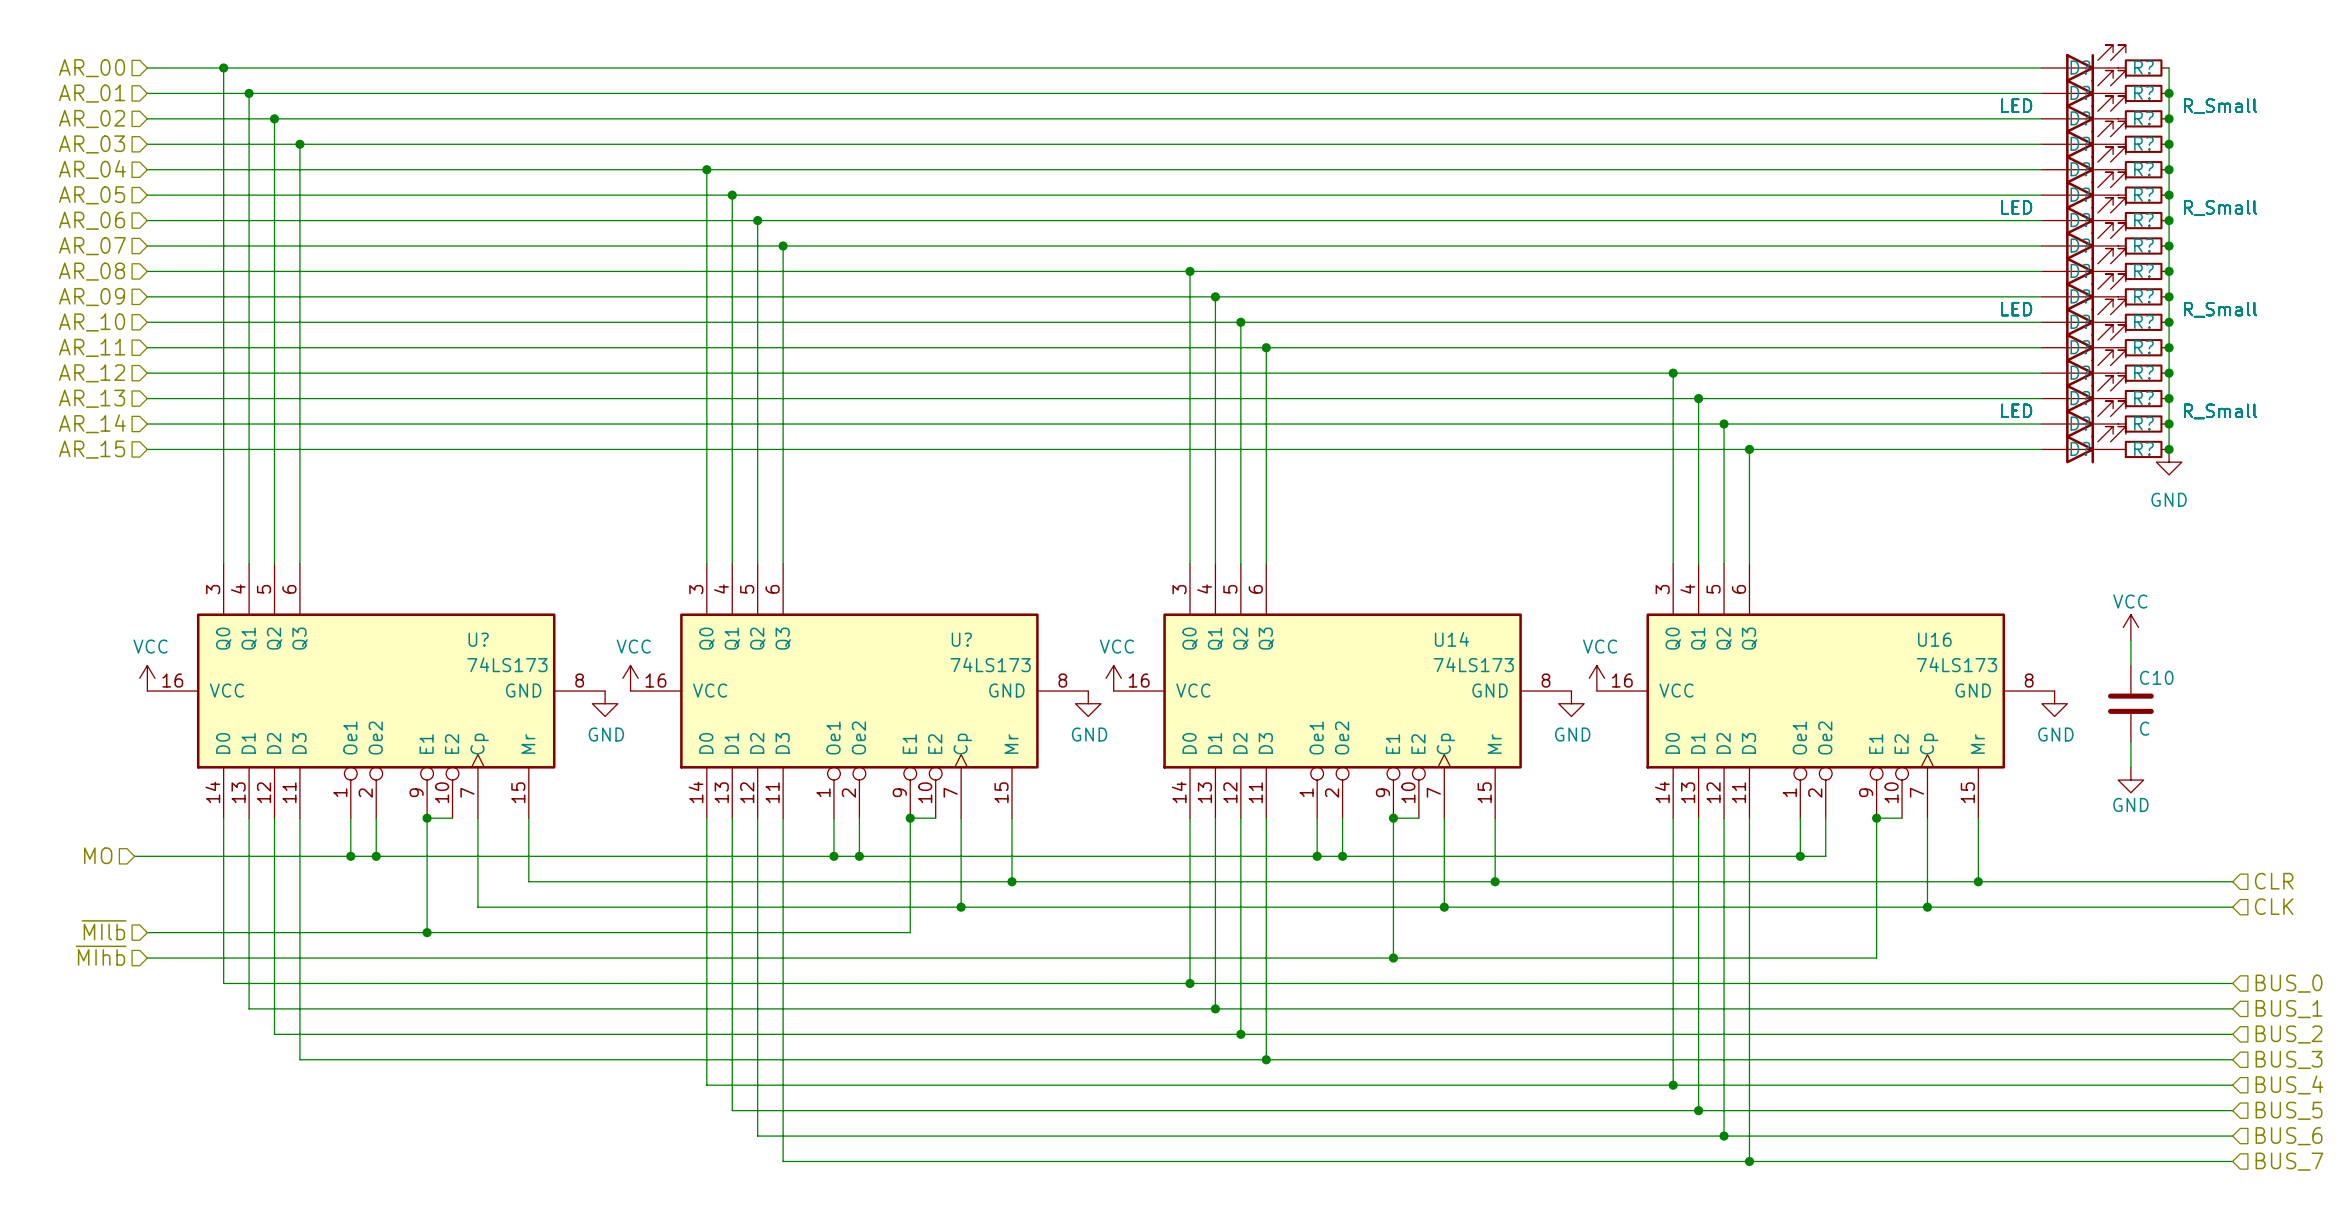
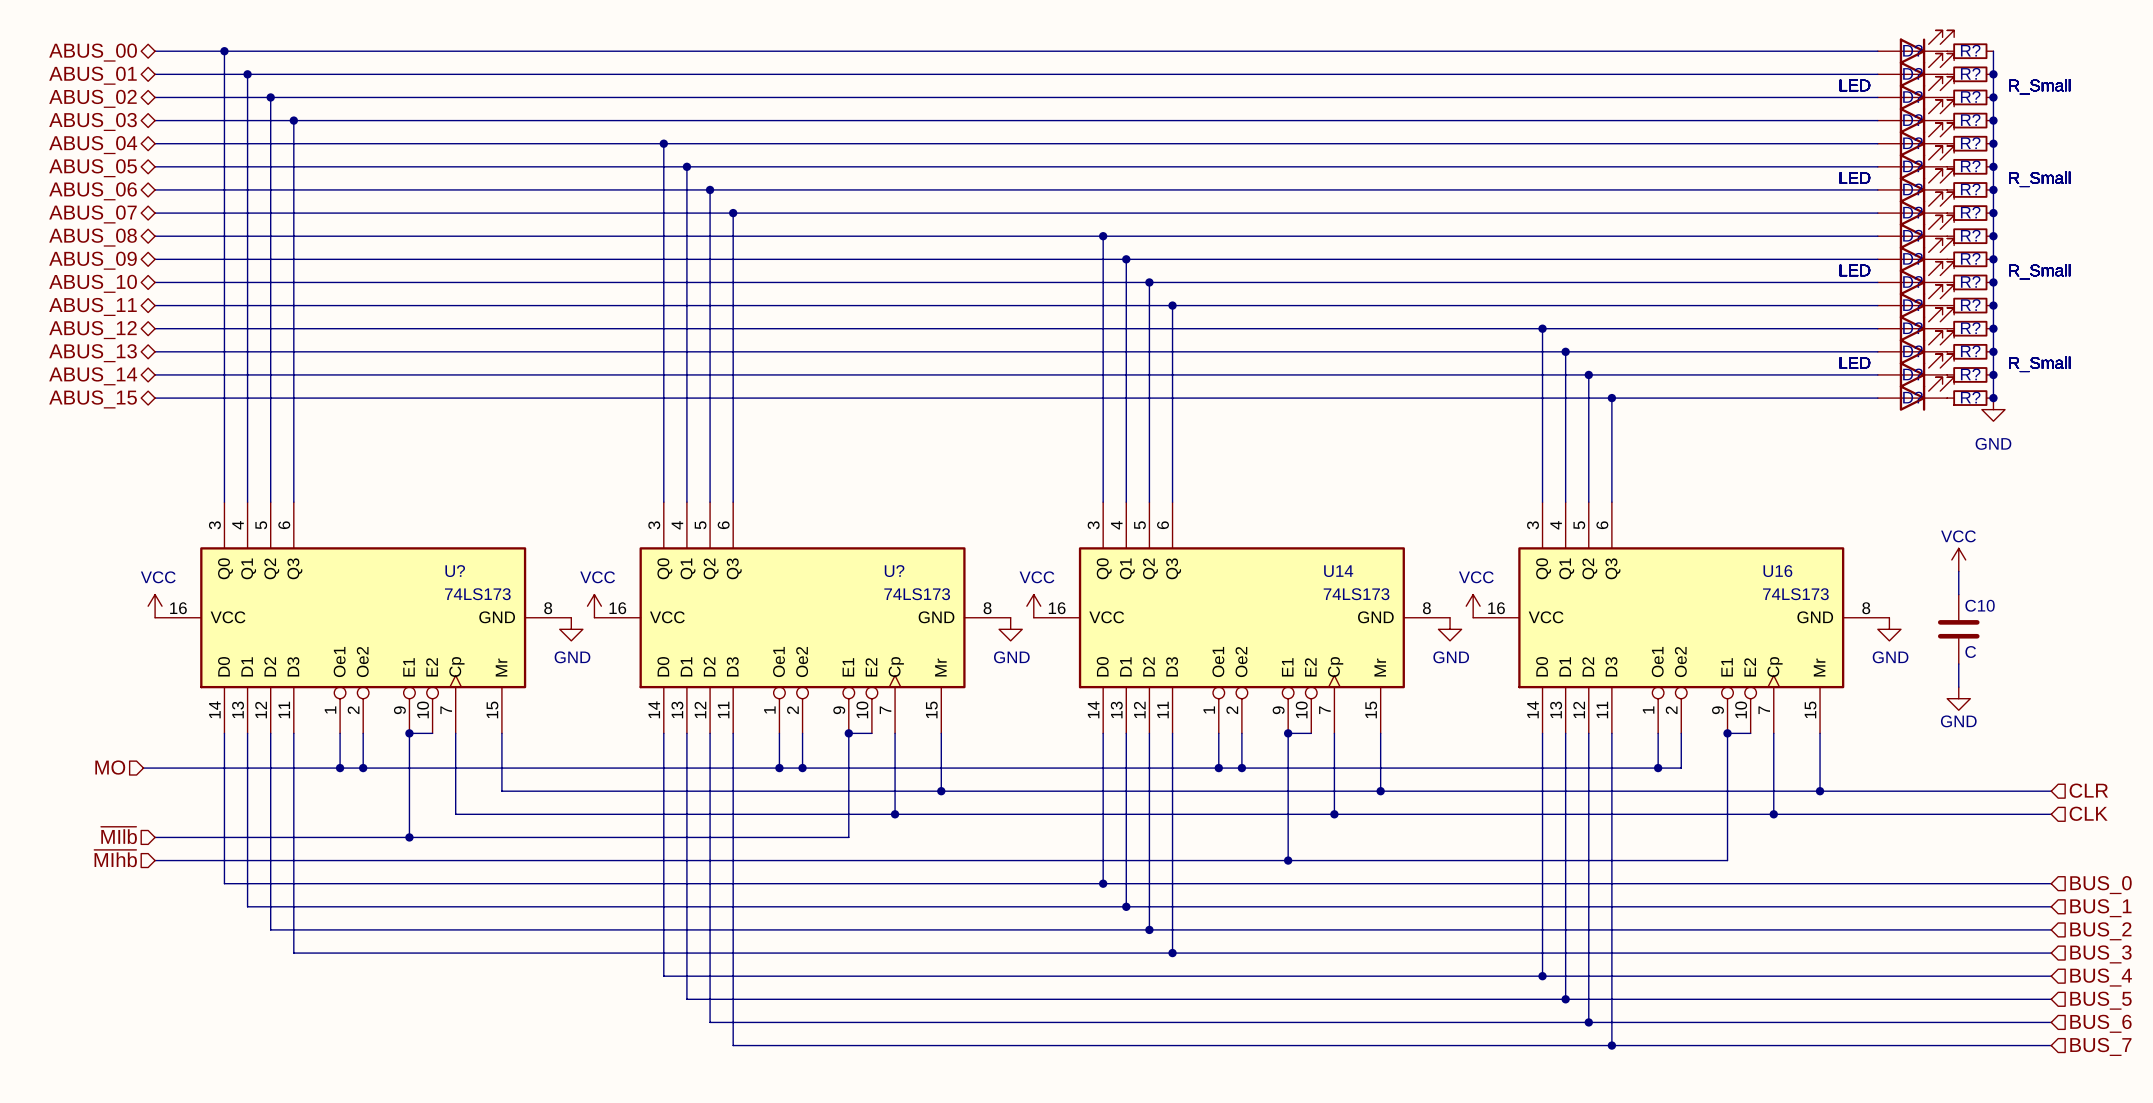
hierarchical label shape: input (92, 68) -> bidirectional (93, 52)
hierarchical label: AR_00 (92, 68) -> ABUS_00 (93, 52)
hierarchical label shape: input (92, 93) -> bidirectional (92, 75)
hierarchical label: AR_01 (92, 93) -> ABUS_01 (92, 75)
hierarchical label shape: input (92, 119) -> bidirectional (92, 98)
hierarchical label: AR_02 (92, 119) -> ABUS_02 (92, 98)
hierarchical label shape: input (92, 144) -> bidirectional (93, 121)
hierarchical label: AR_03 (92, 144) -> ABUS_03 (93, 121)
hierarchical label shape: input (92, 169) -> bidirectional (93, 145)
hierarchical label: AR_04 (92, 169) -> ABUS_04 (93, 145)
hierarchical label shape: input (92, 195) -> bidirectional (93, 168)
hierarchical label: AR_05 (92, 195) -> ABUS_05 (93, 168)
hierarchical label shape: input (92, 220) -> bidirectional (93, 191)
hierarchical label: AR_06 (92, 220) -> ABUS_06 (93, 191)
hierarchical label shape: input (92, 246) -> bidirectional (92, 214)
hierarchical label: AR_07 (92, 246) -> ABUS_07 (92, 214)
hierarchical label shape: input (92, 271) -> bidirectional (93, 237)
hierarchical label: AR_08 (92, 271) -> ABUS_08 (93, 237)
hierarchical label shape: input (92, 297) -> bidirectional (92, 260)
hierarchical label: AR_09 (92, 297) -> ABUS_09 (92, 260)
hierarchical label shape: input (92, 322) -> bidirectional (93, 283)
hierarchical label: AR_10 (92, 322) -> ABUS_10 (93, 283)
hierarchical label shape: input (92, 347) -> bidirectional (92, 306)
hierarchical label: AR_11 (92, 347) -> ABUS_11 (92, 306)
hierarchical label shape: input (92, 373) -> bidirectional (92, 330)
hierarchical label: AR_12 (92, 373) -> ABUS_12 (92, 330)
hierarchical label shape: input (92, 398) -> bidirectional (93, 353)
hierarchical label: AR_13 (92, 398) -> ABUS_13 (93, 353)
hierarchical label shape: input (92, 423) -> bidirectional (93, 376)
hierarchical label: AR_14 (92, 423) -> ABUS_14 (93, 376)
hierarchical label shape: input (92, 449) -> bidirectional (93, 399)
hierarchical label: AR_15 (92, 449) -> ABUS_15 (93, 399)

